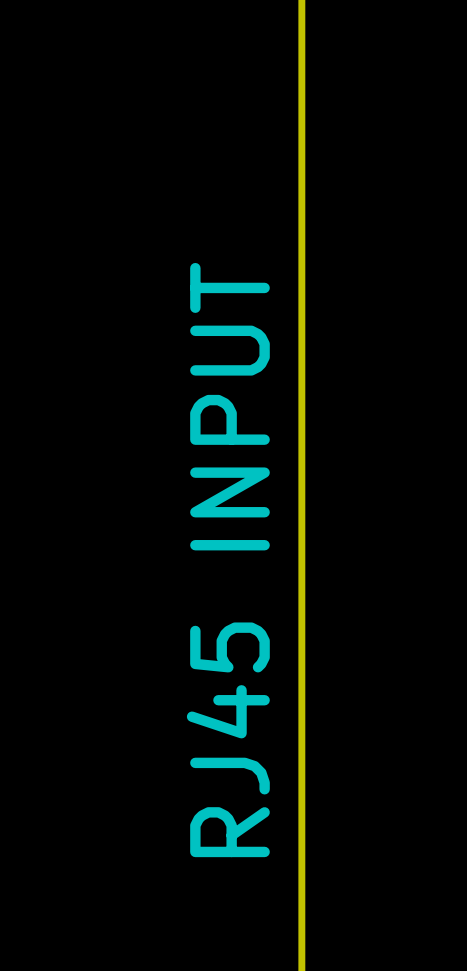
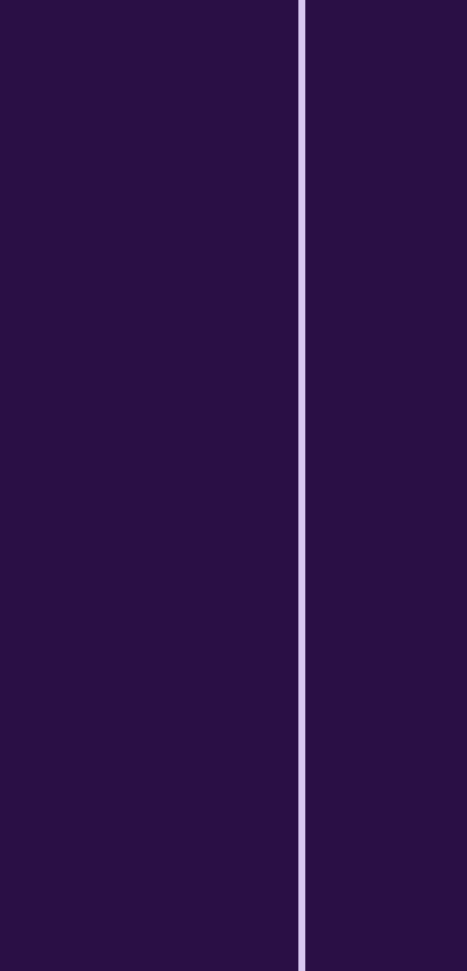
text: RJ45 INPUT (228, 560) -> none

